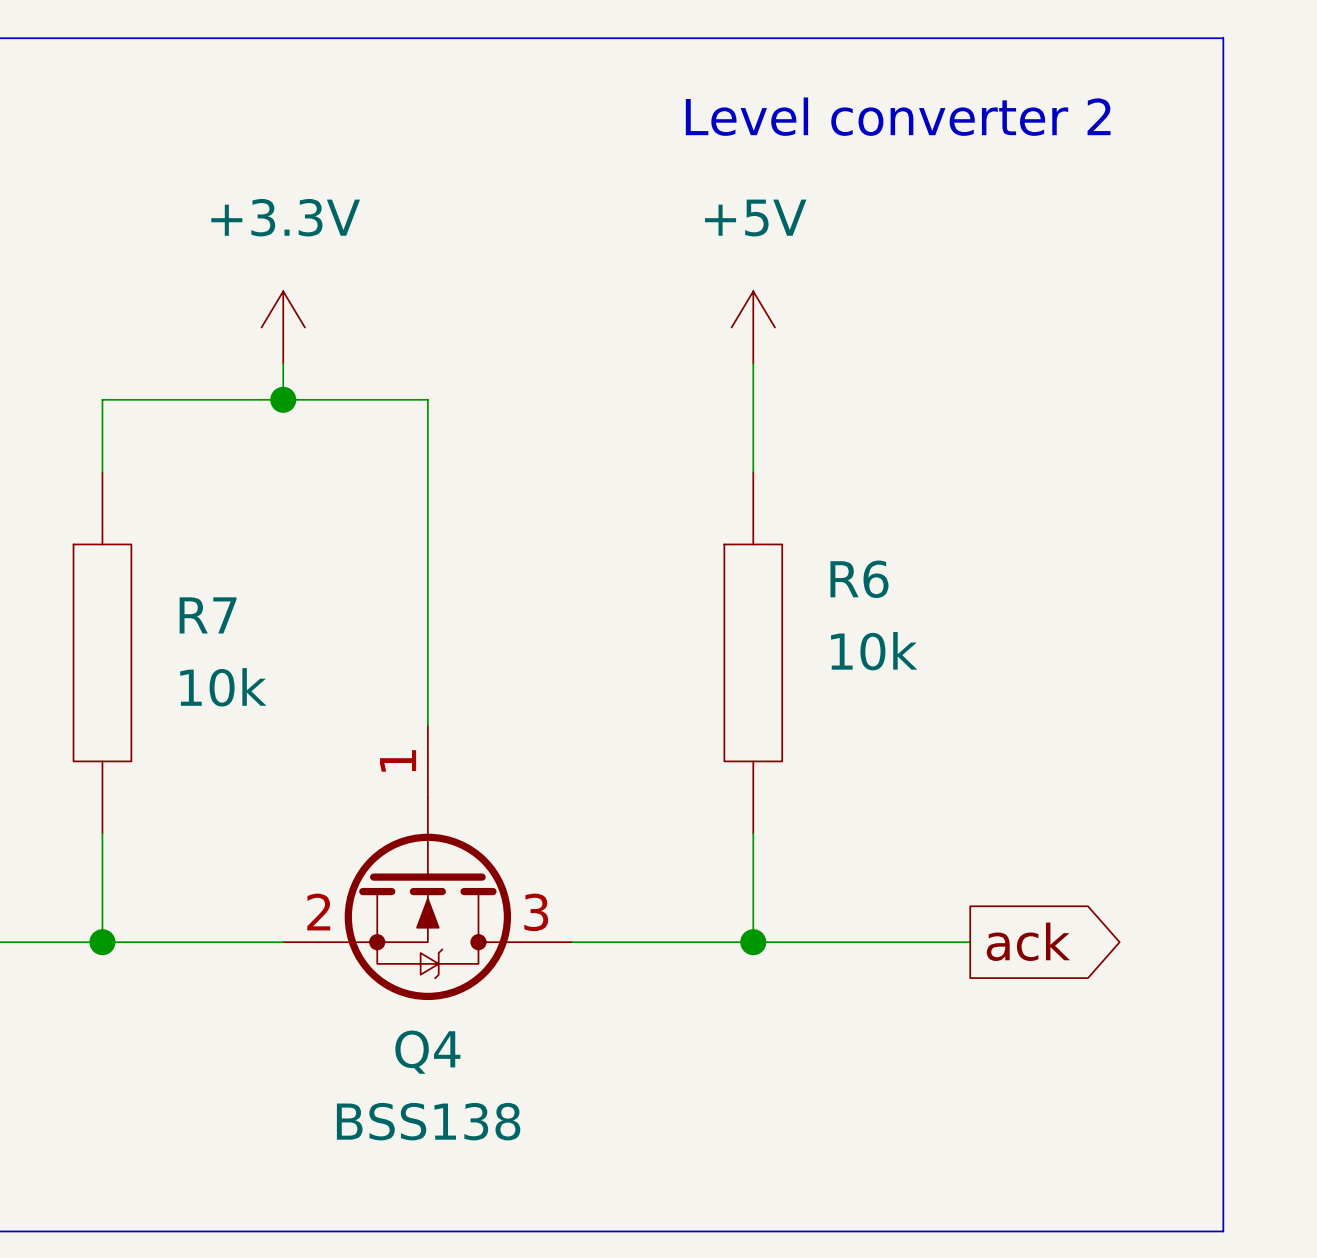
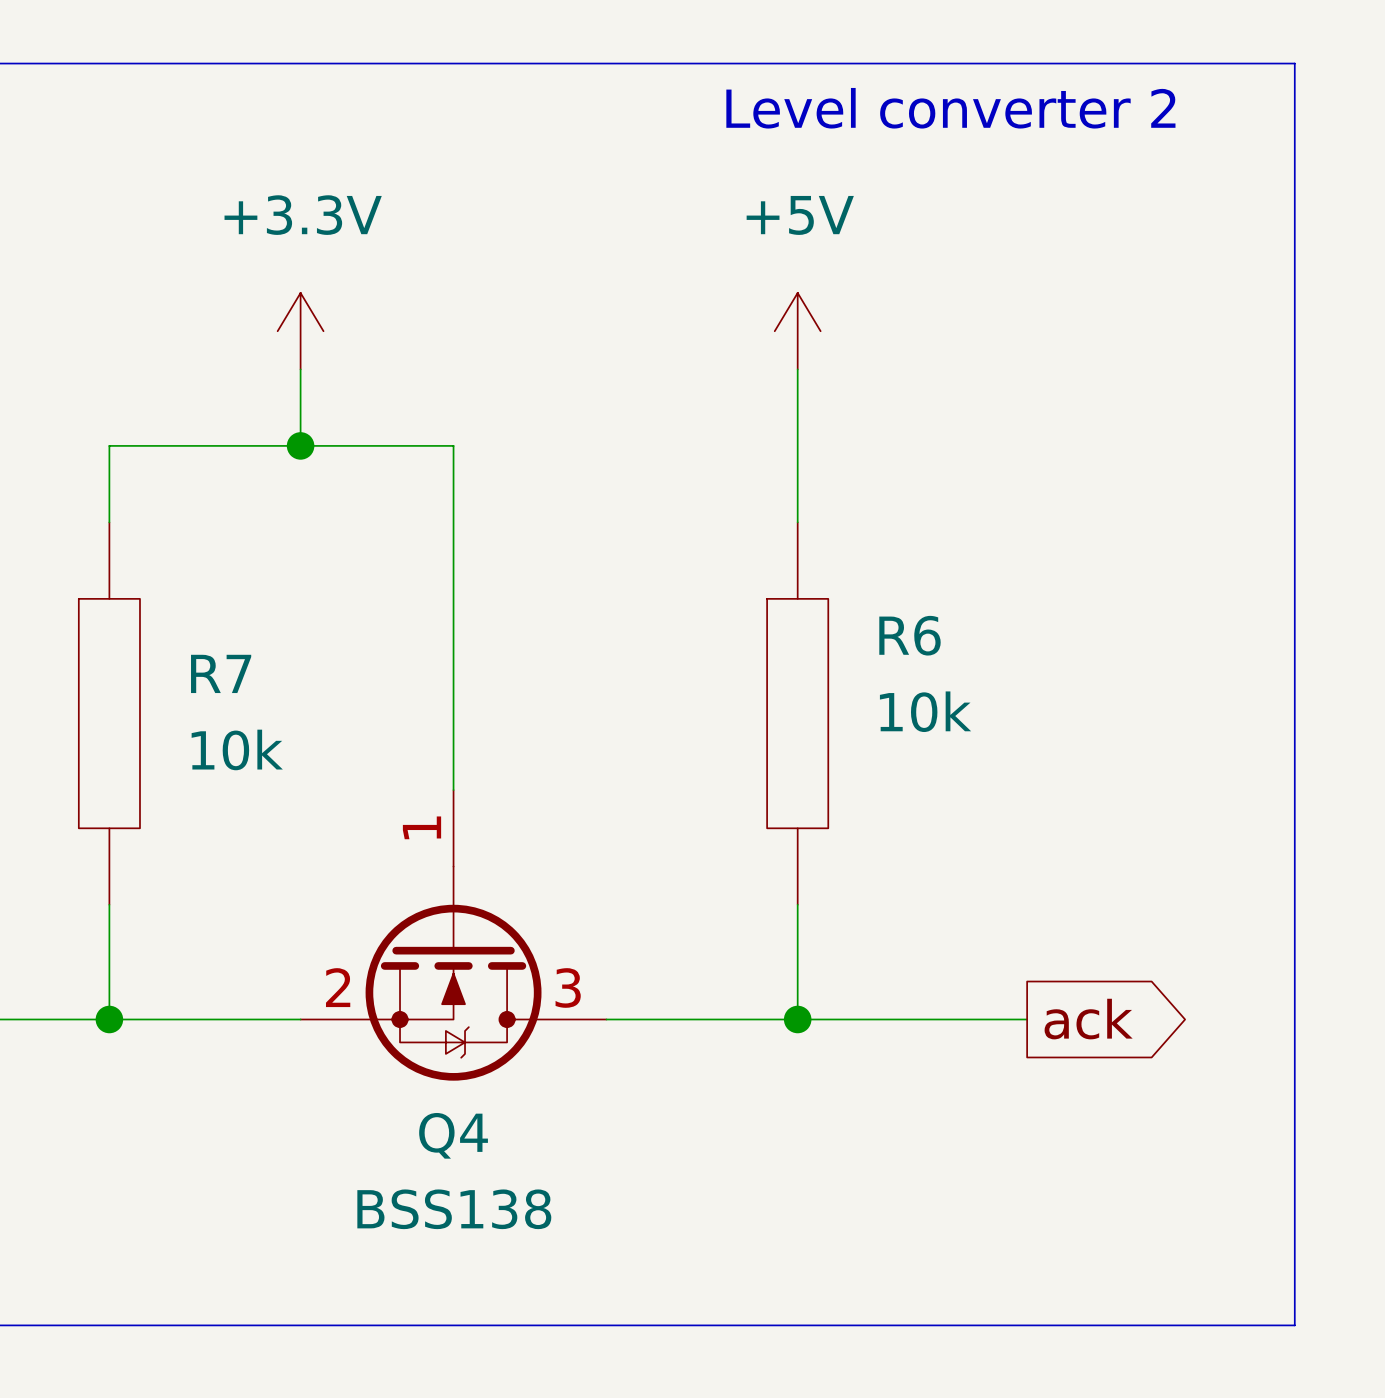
text position: Level converter 2 (898, 116) -> Level converter 2 (950, 108)
power symbol position: +3.3V (283, 327) -> +3.3V (300, 331)
power symbol position: +5V (753, 327) -> +5V (797, 331)

